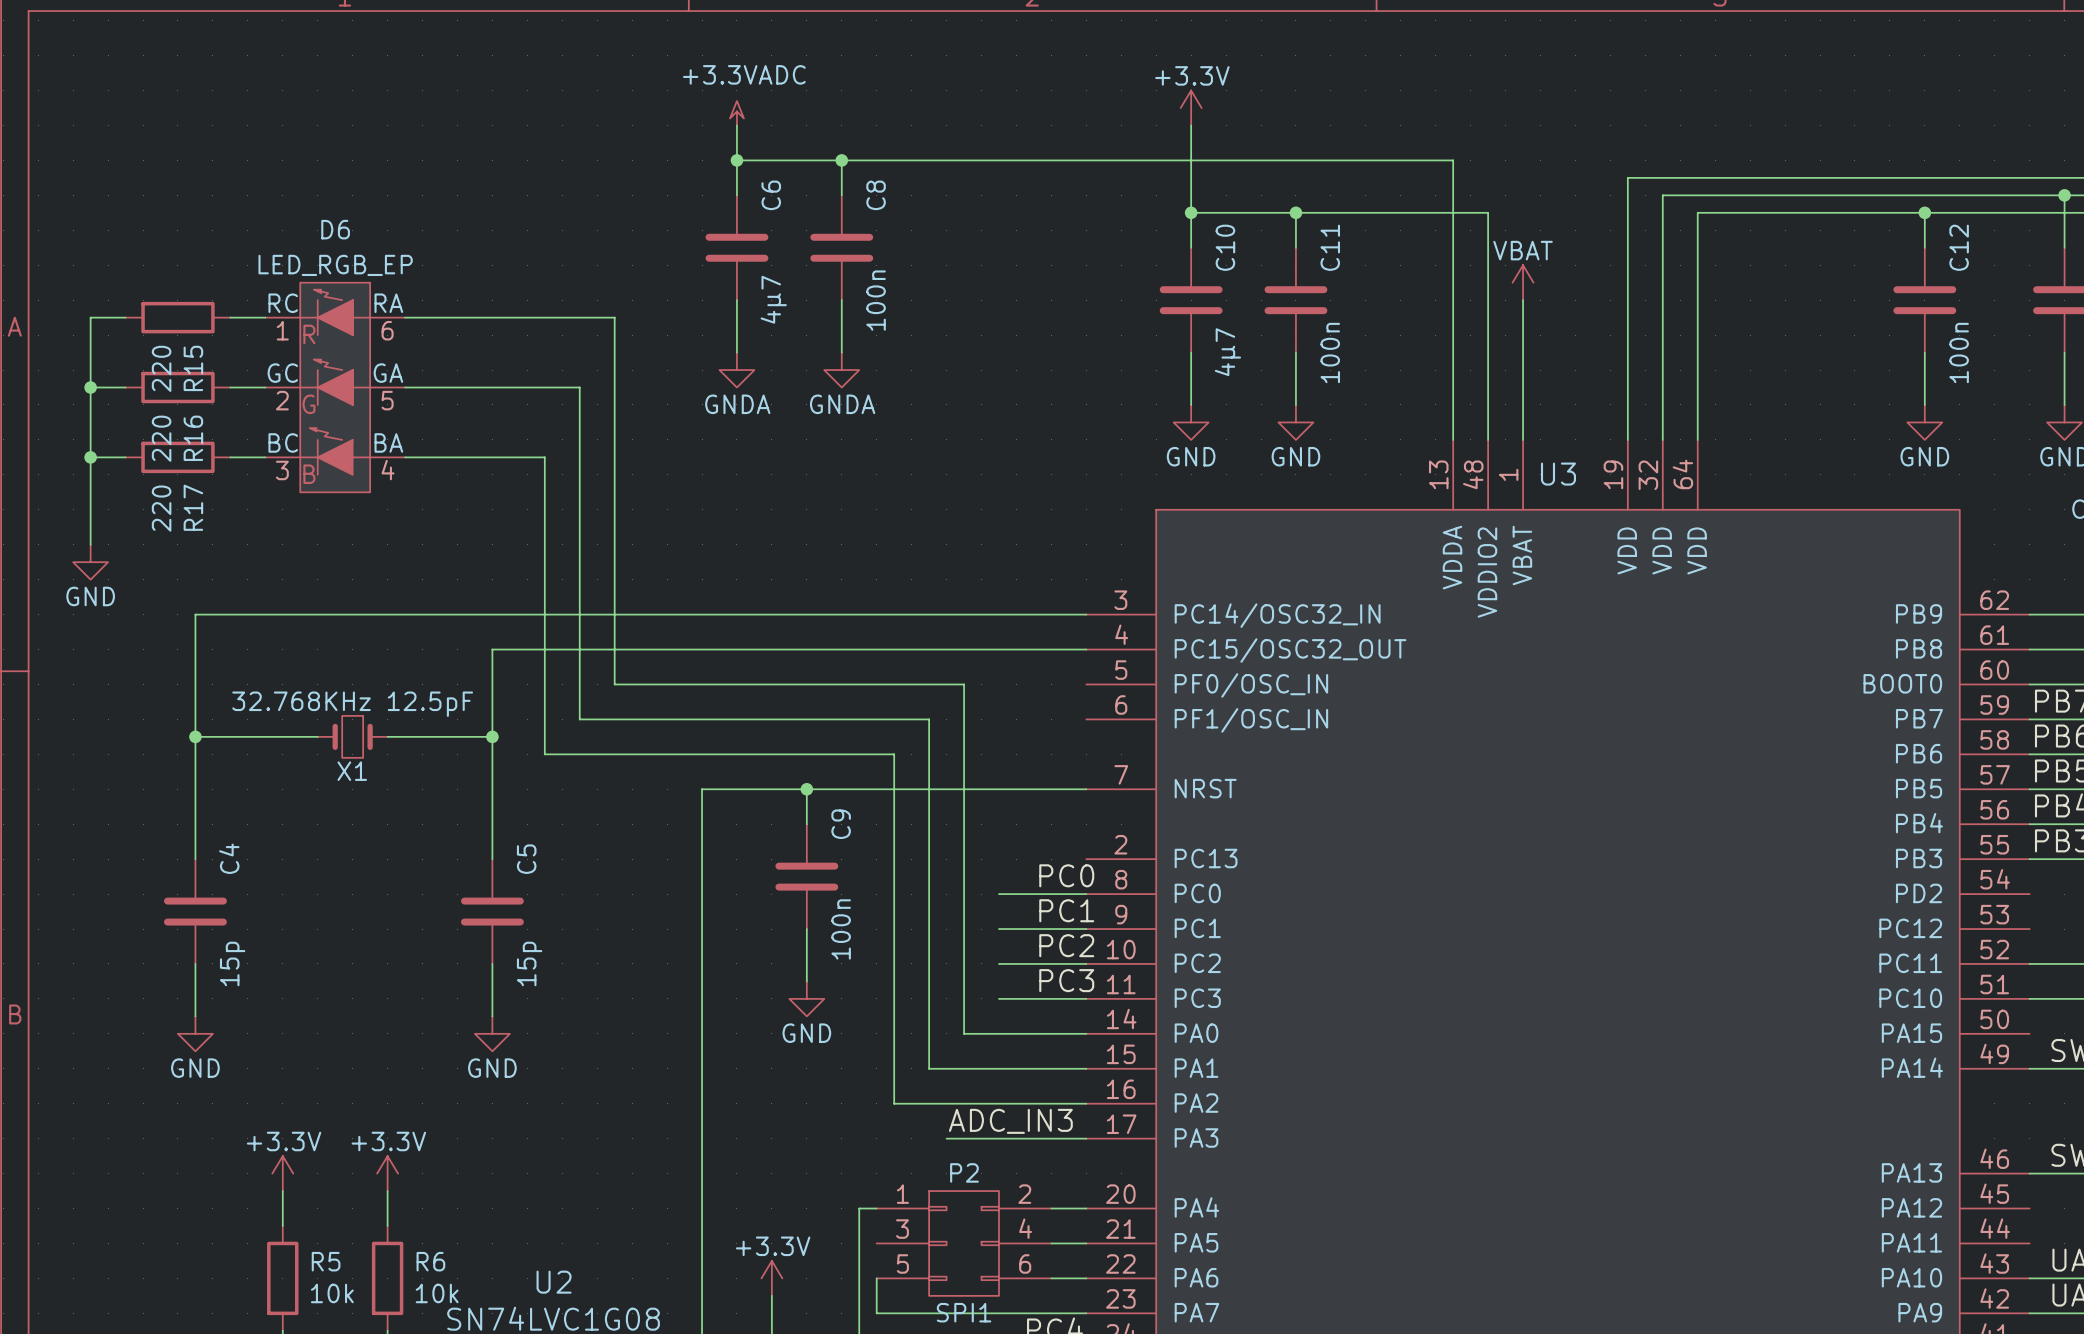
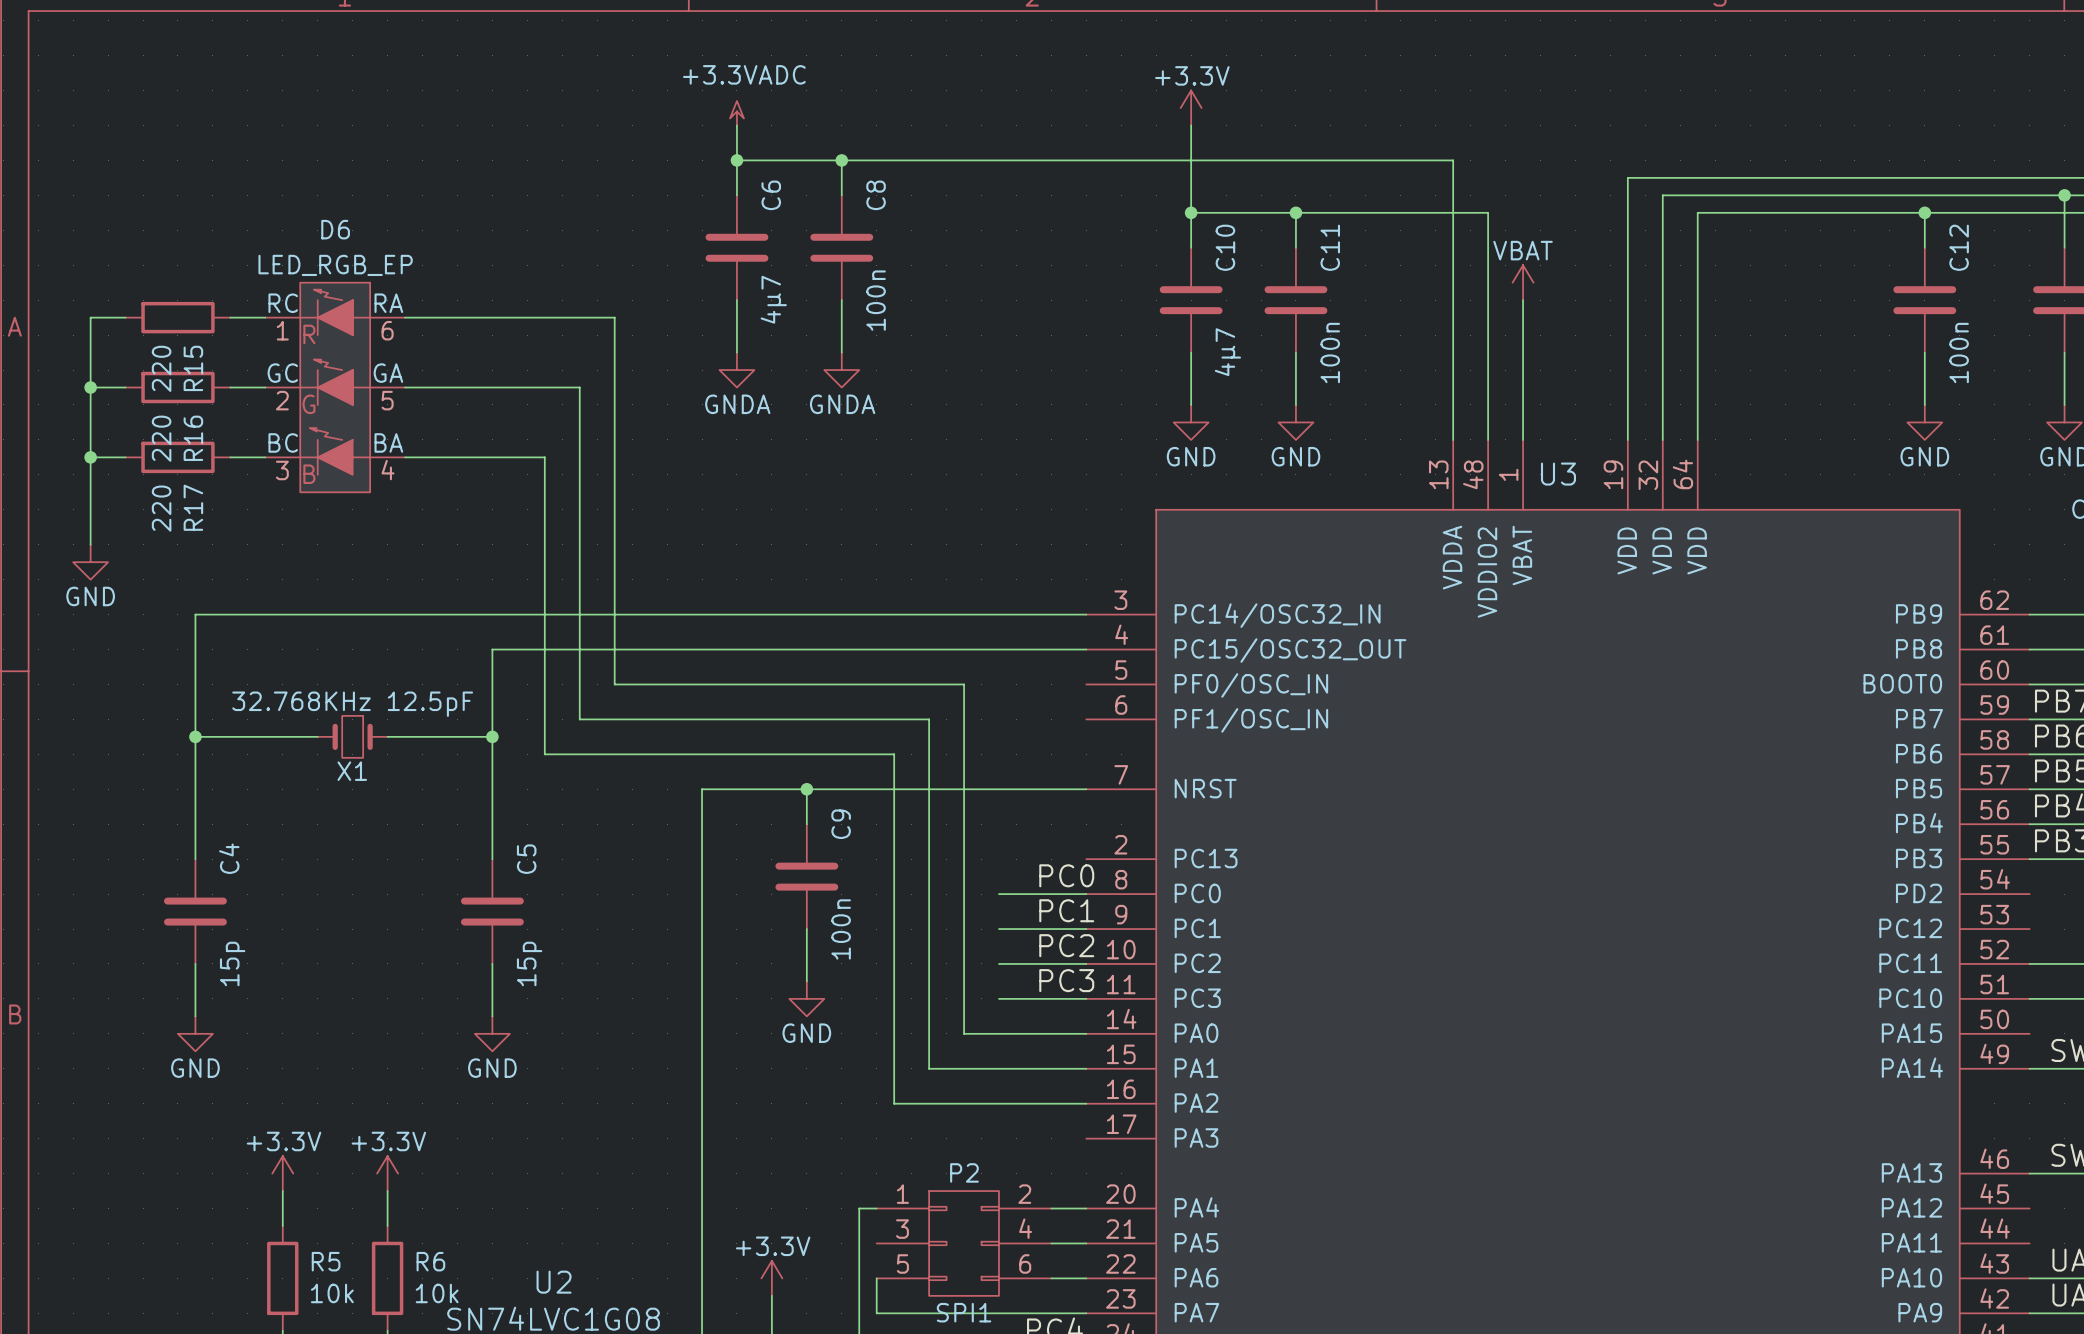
label: ADC_IN3 (1010, 1121) -> none
wire: (946, 1138) (1086, 1138) -> none

